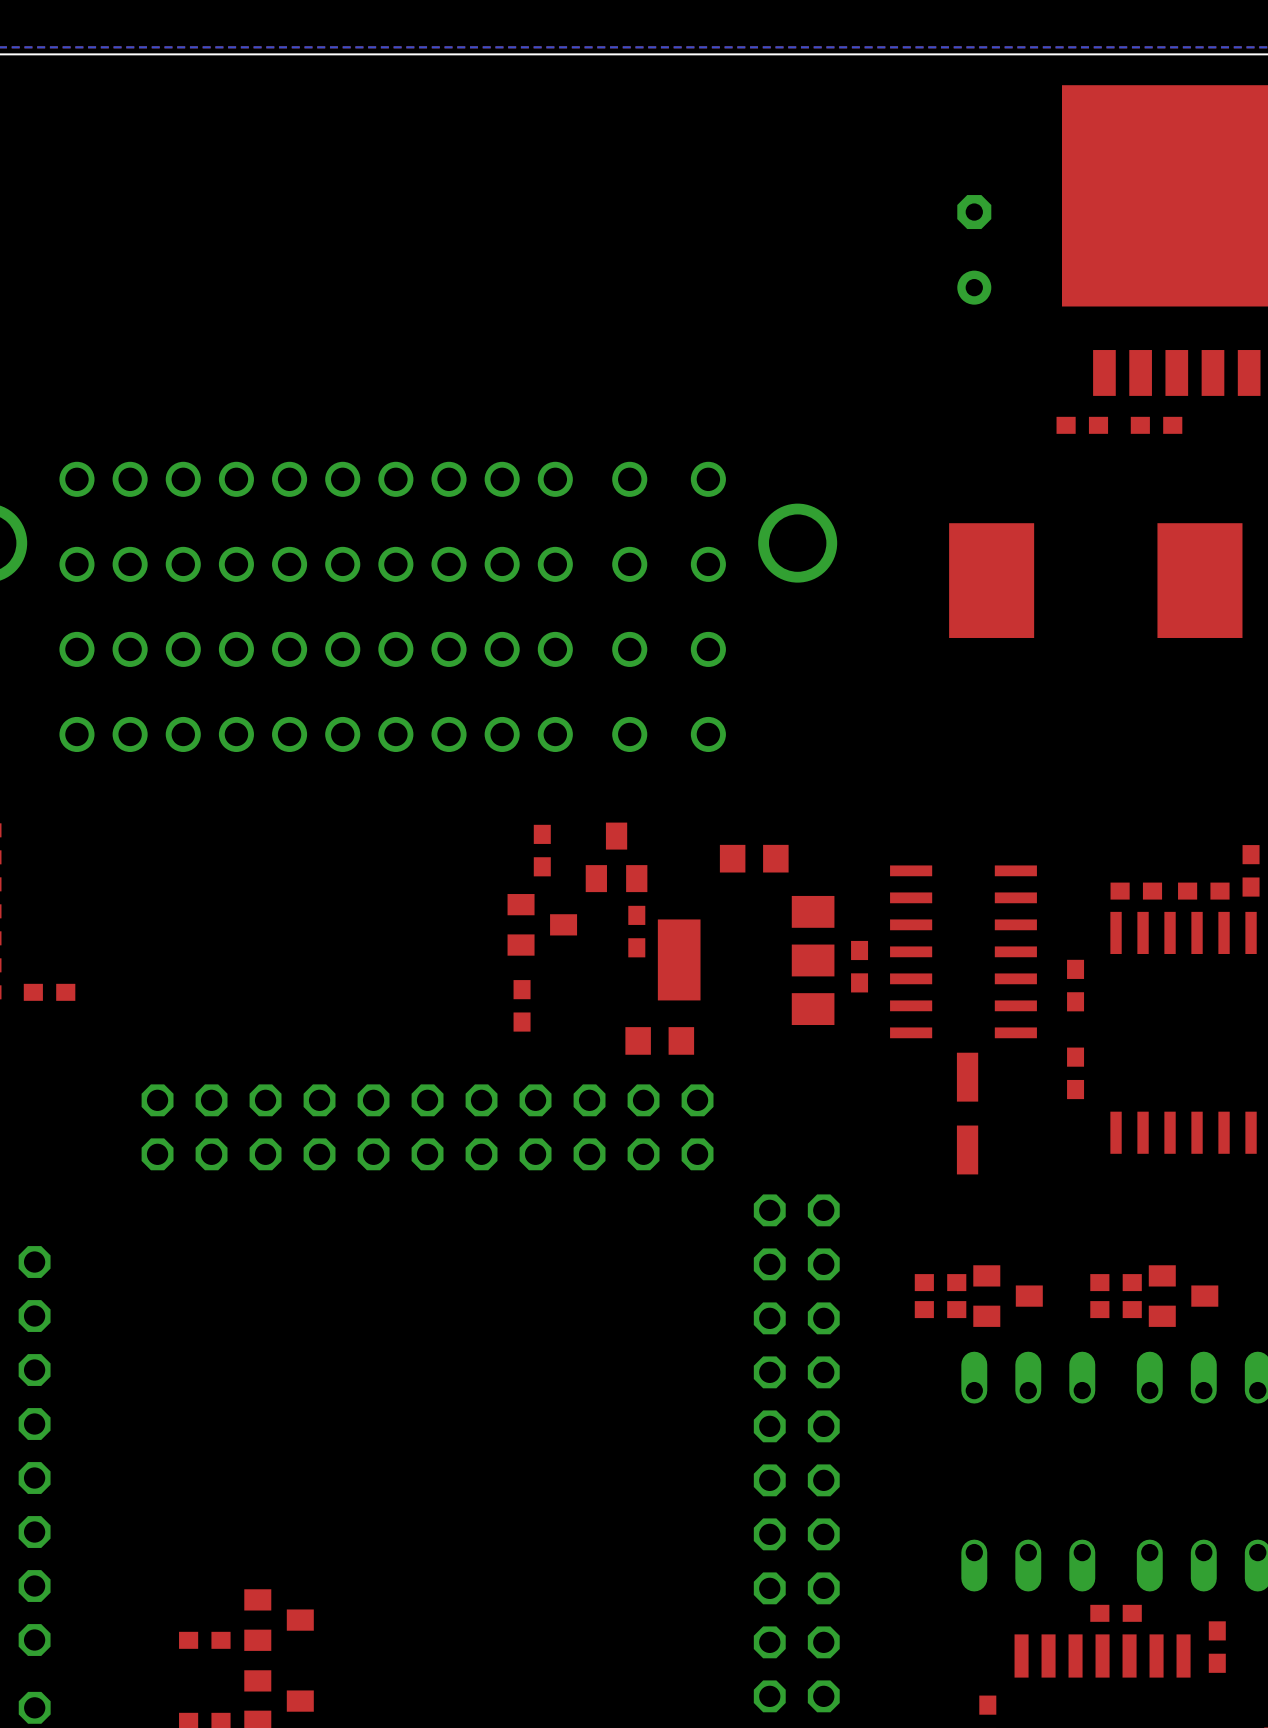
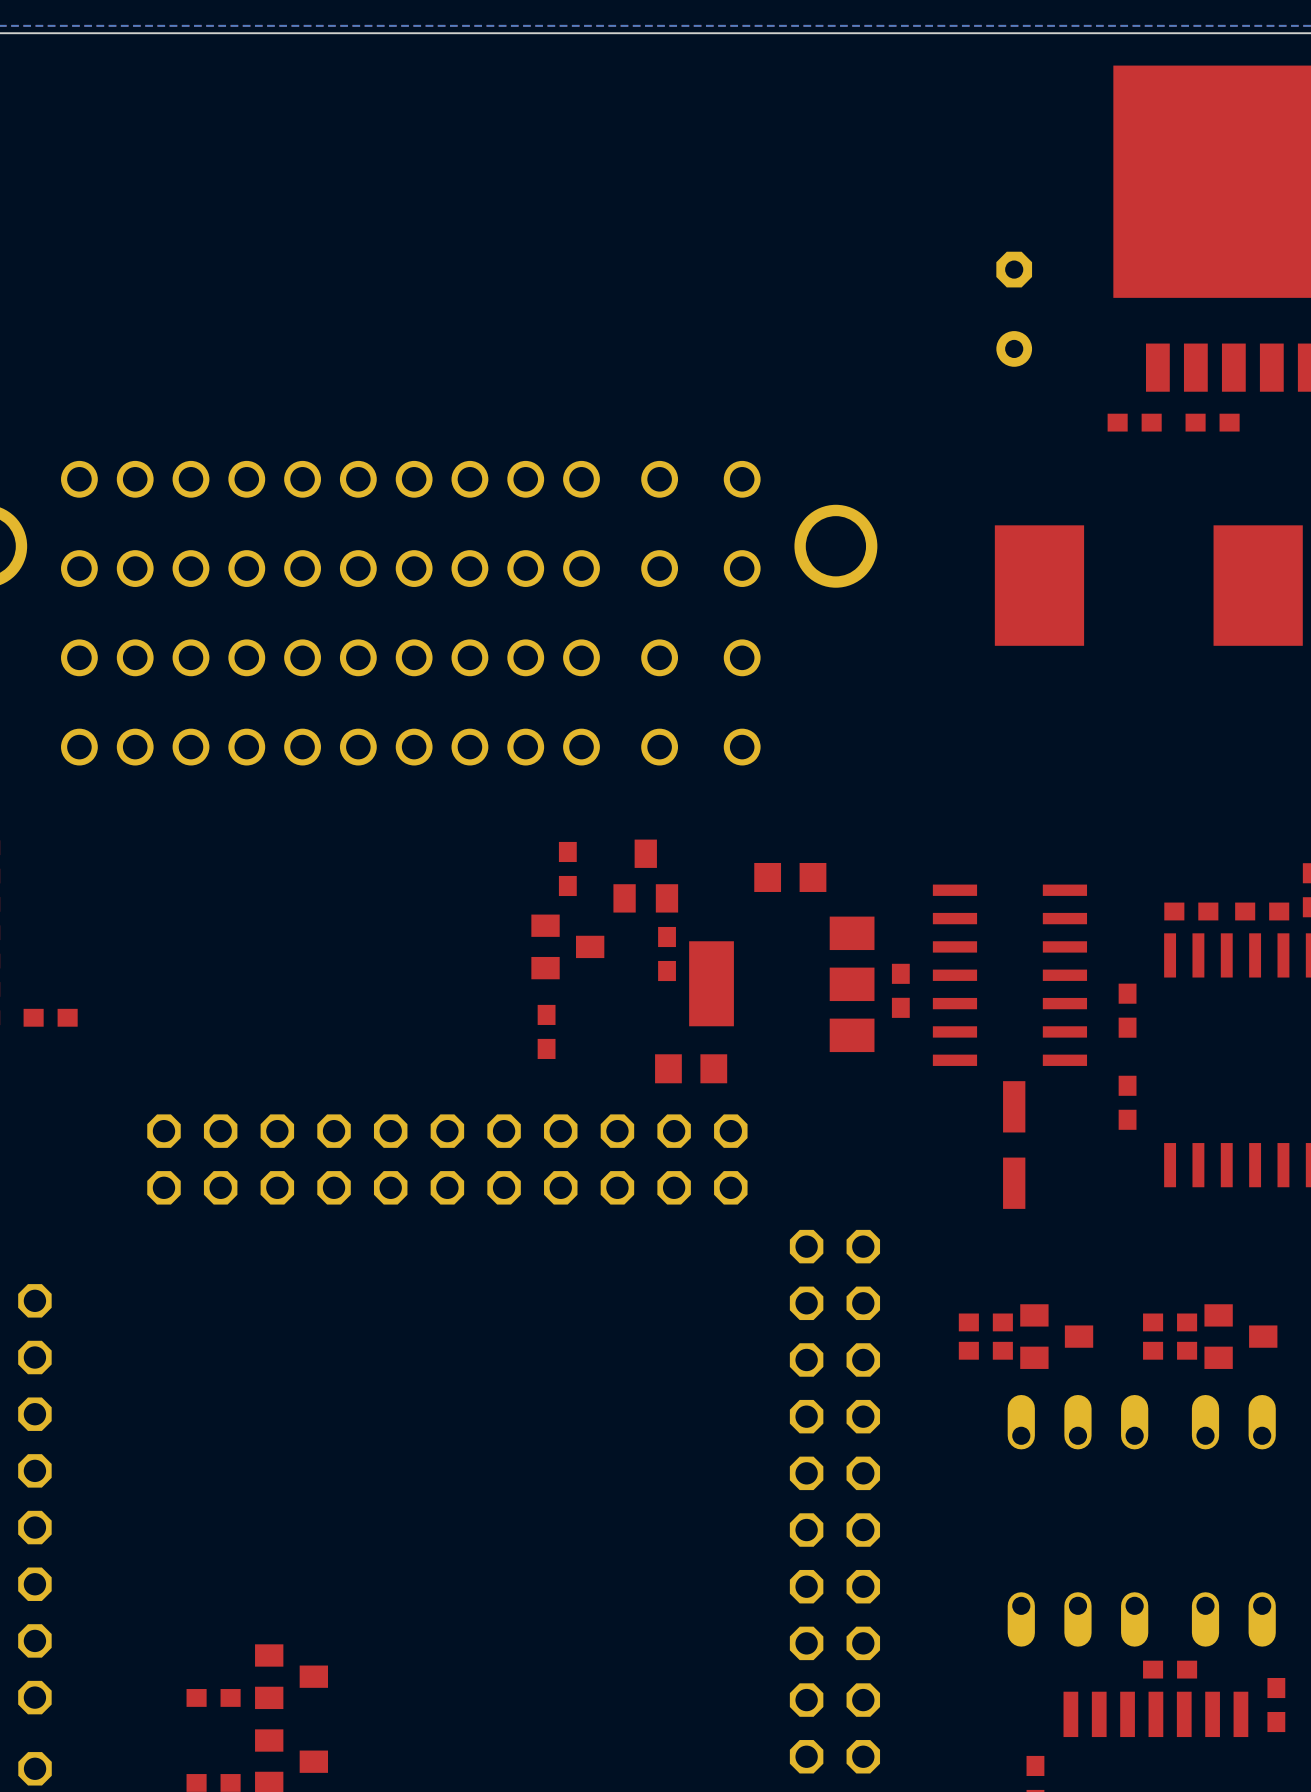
part position: (974, 249) -> (1014, 309)

